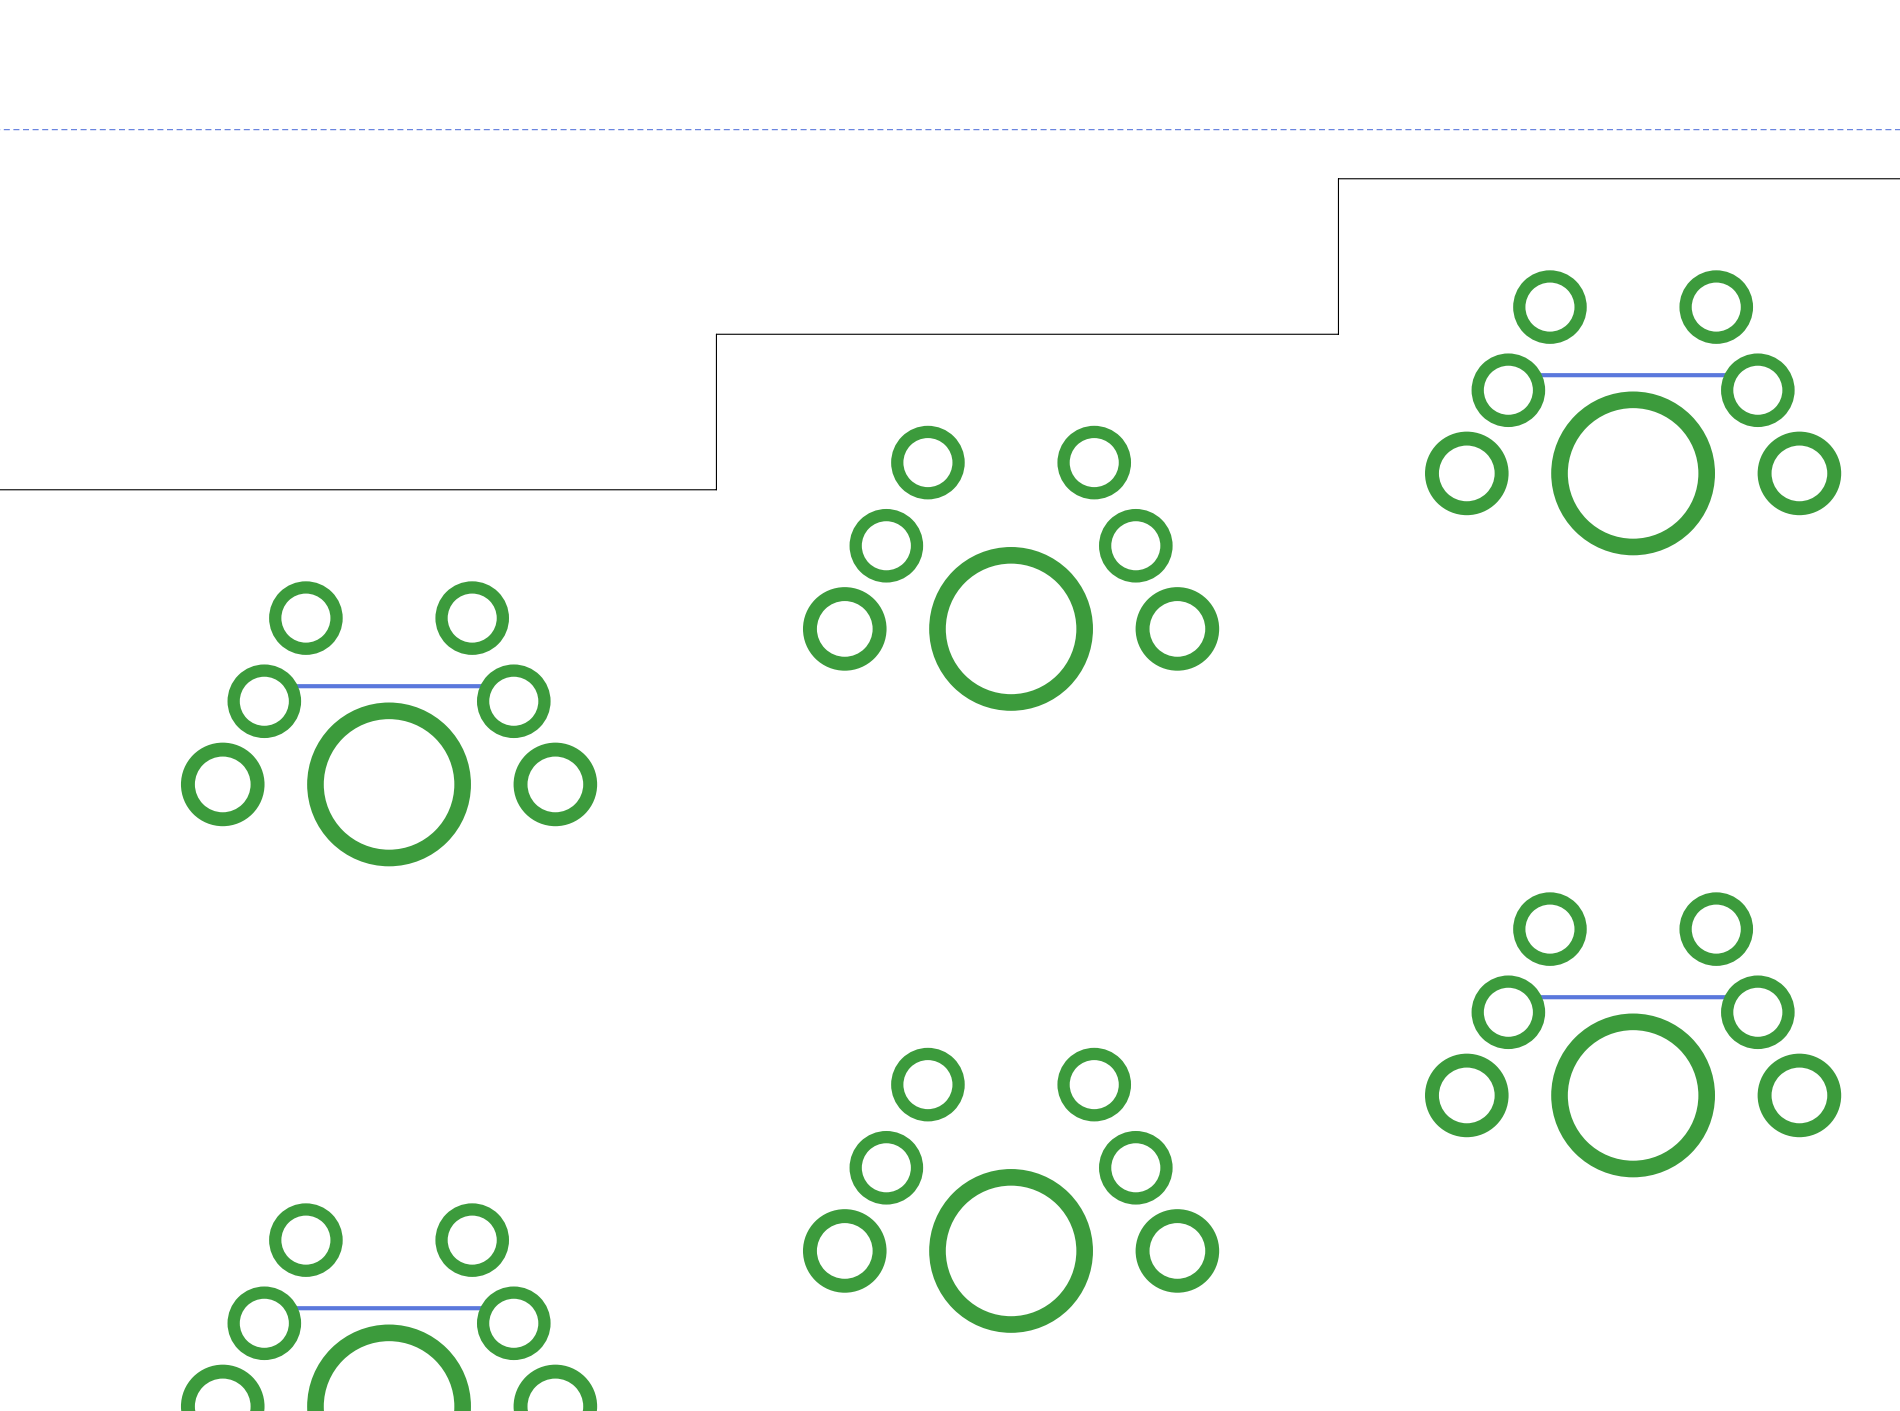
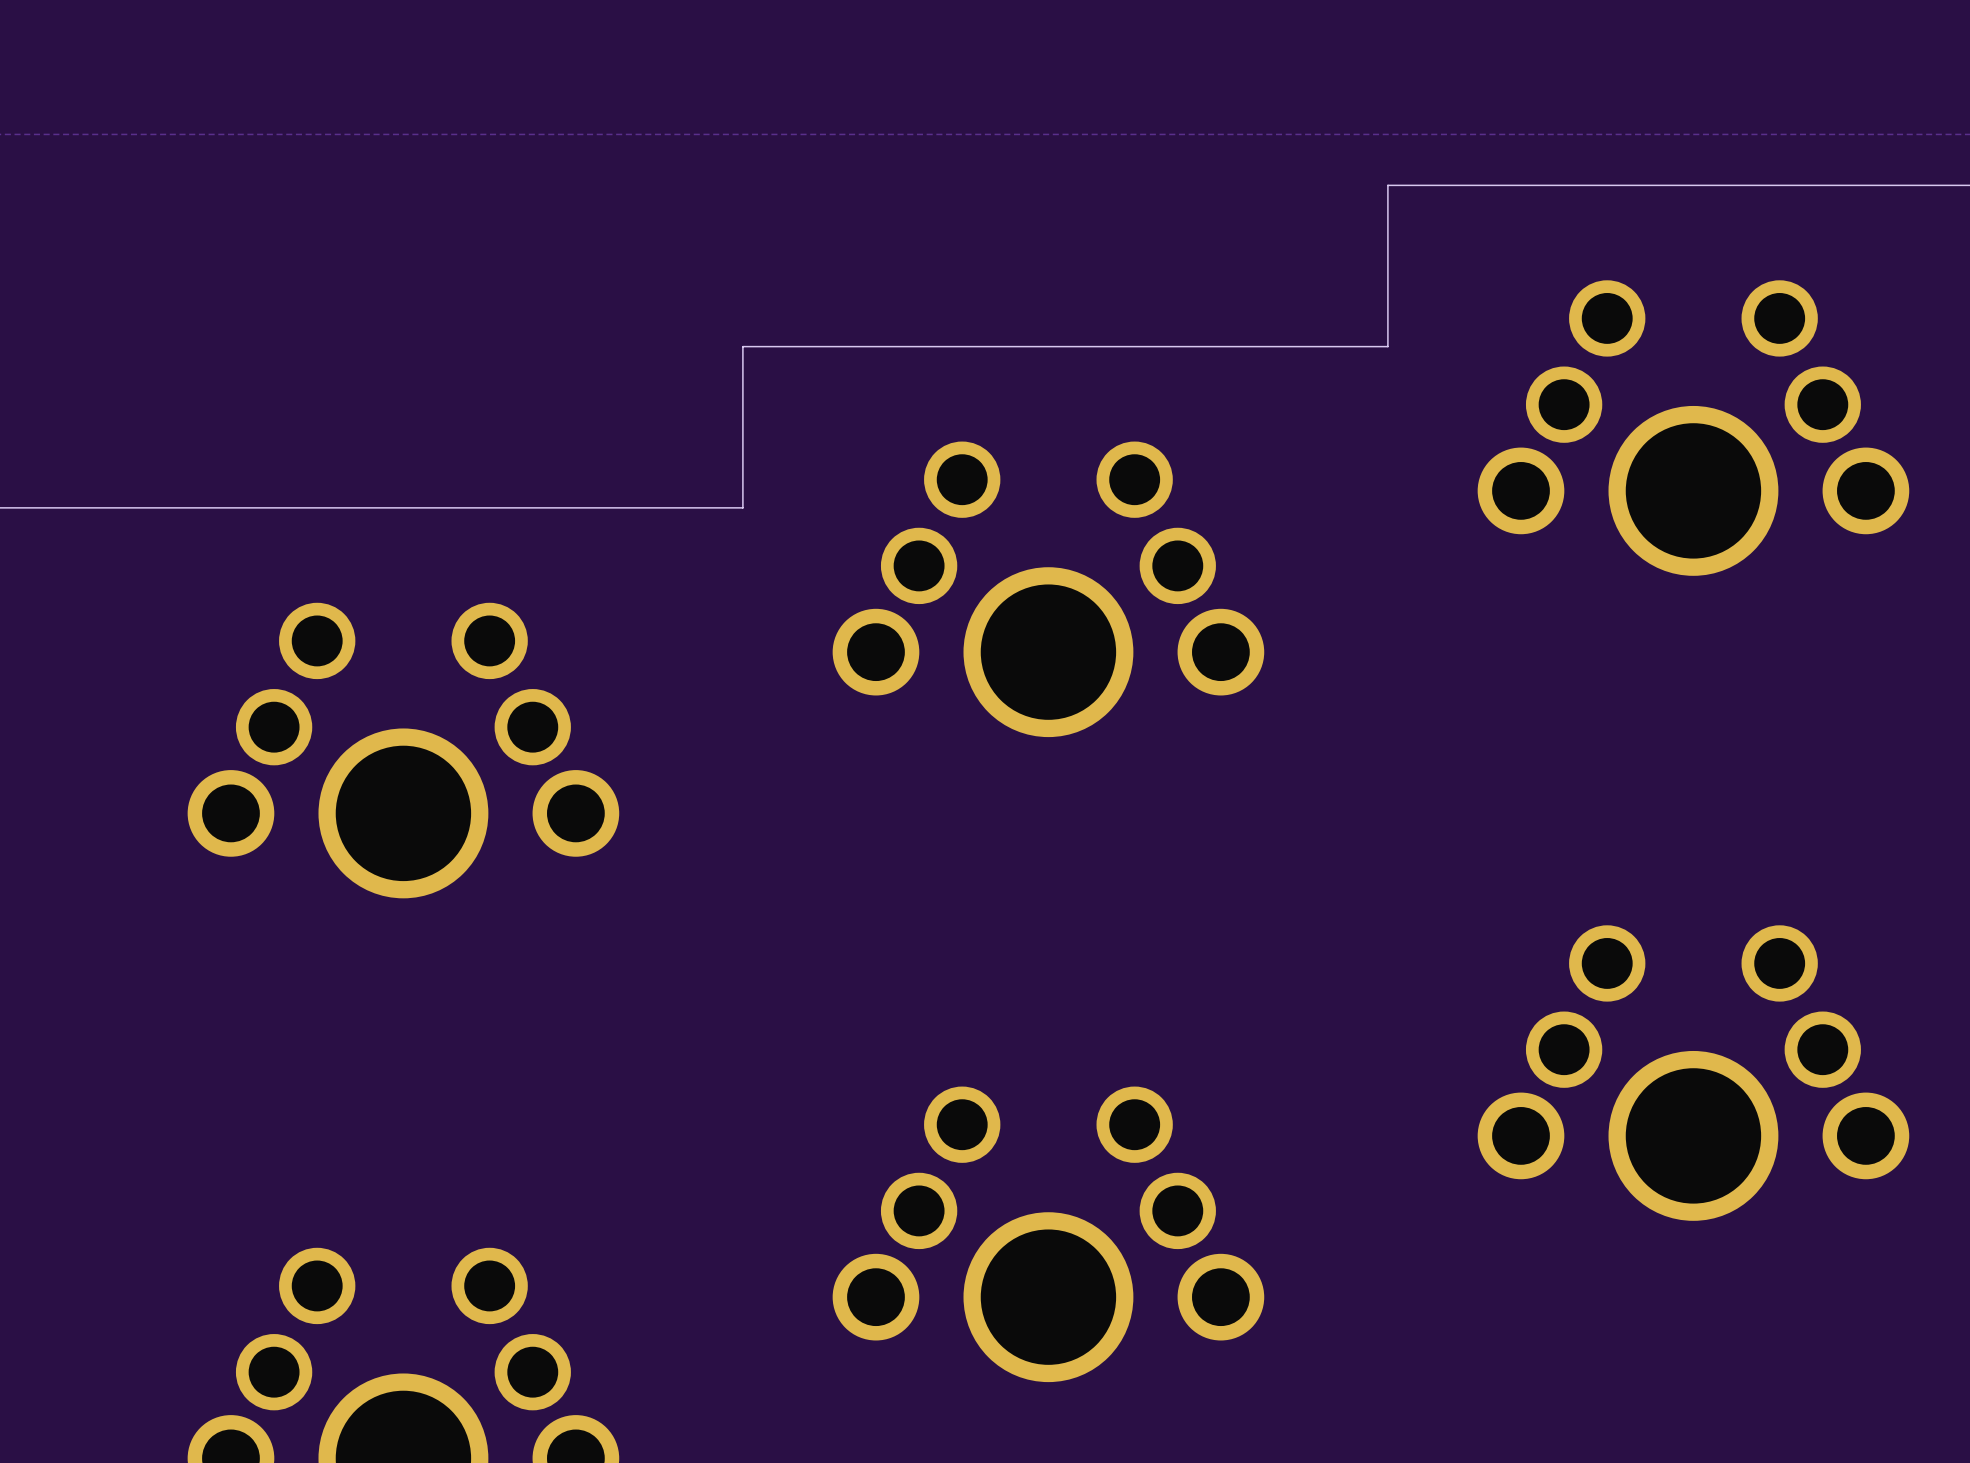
track: (1757, 390) (1747, 375) (1518, 375) (1508, 390) -> none
track: (513, 701) (503, 686) (274, 686) (264, 701) -> none
track: (1757, 1012) (1747, 997) (1518, 997) (1508, 1012) -> none
track: (513, 1323) (503, 1308) (274, 1308) (264, 1323) -> none

